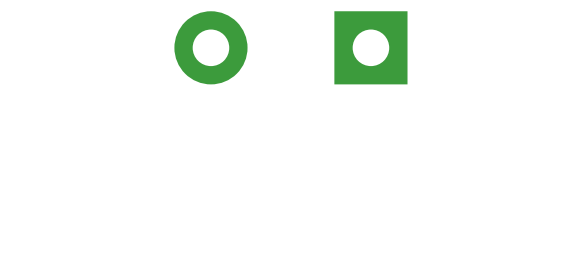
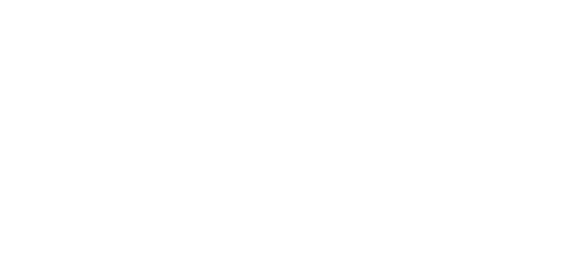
part: (290, 47) -> none

